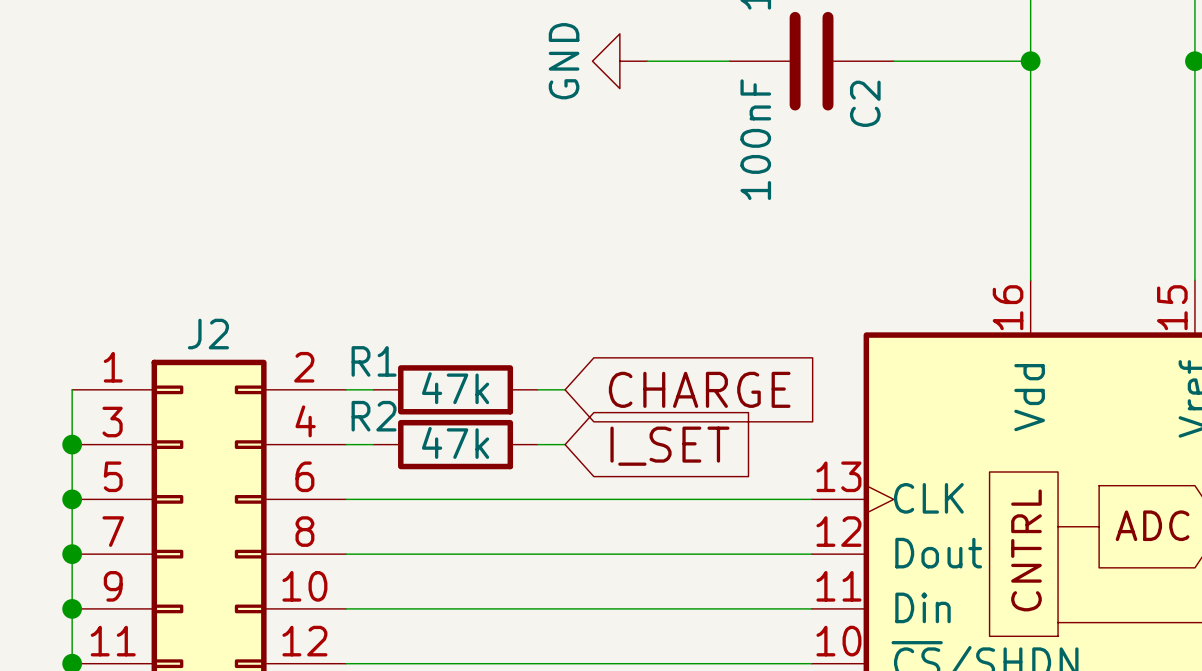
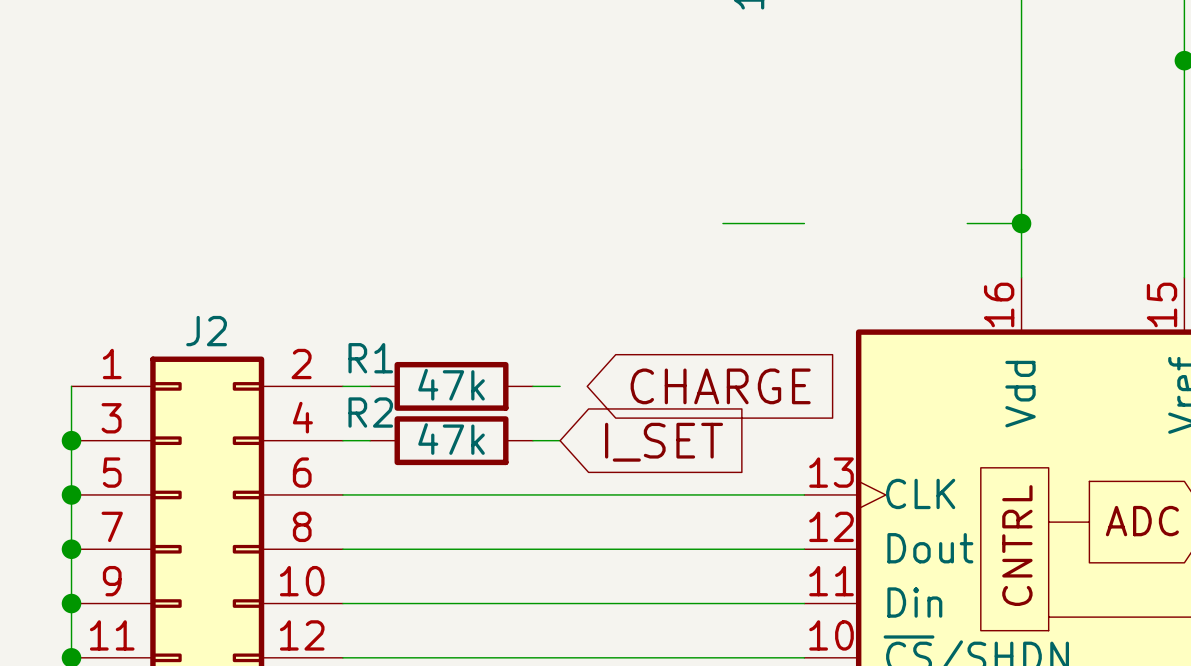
power symbol: GND (619, 61) -> none
wire: (647, 61) (729, 61) -> (722, 223) (804, 223)
C2: 100nF (811, 61) -> none
wire: (893, 61) (1030, 61) -> none
junction: (1030, 61) -> none
wire: none -> (967, 223) (1021, 223)
junction: none -> (1021, 223)
global label position: CHARGE (699, 389) -> CHARGE (720, 386)

